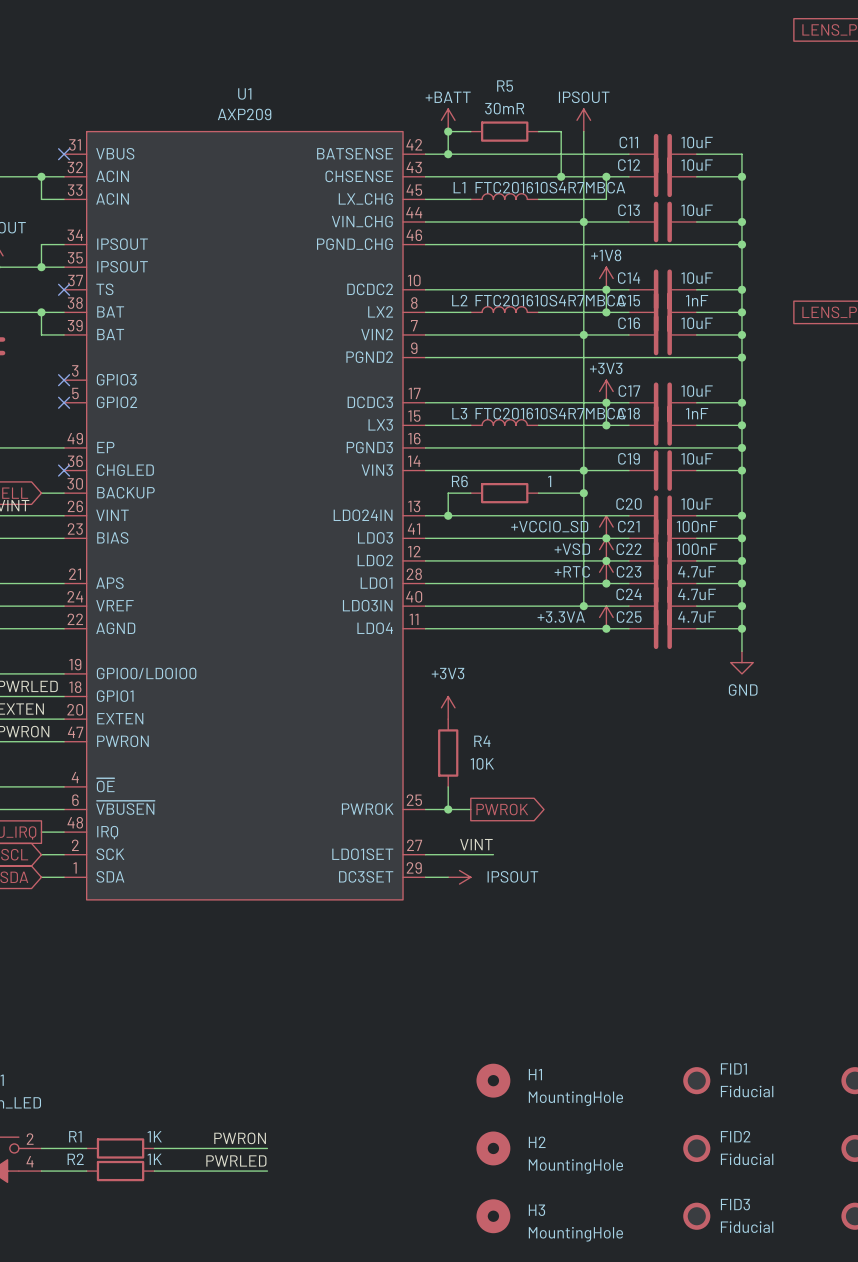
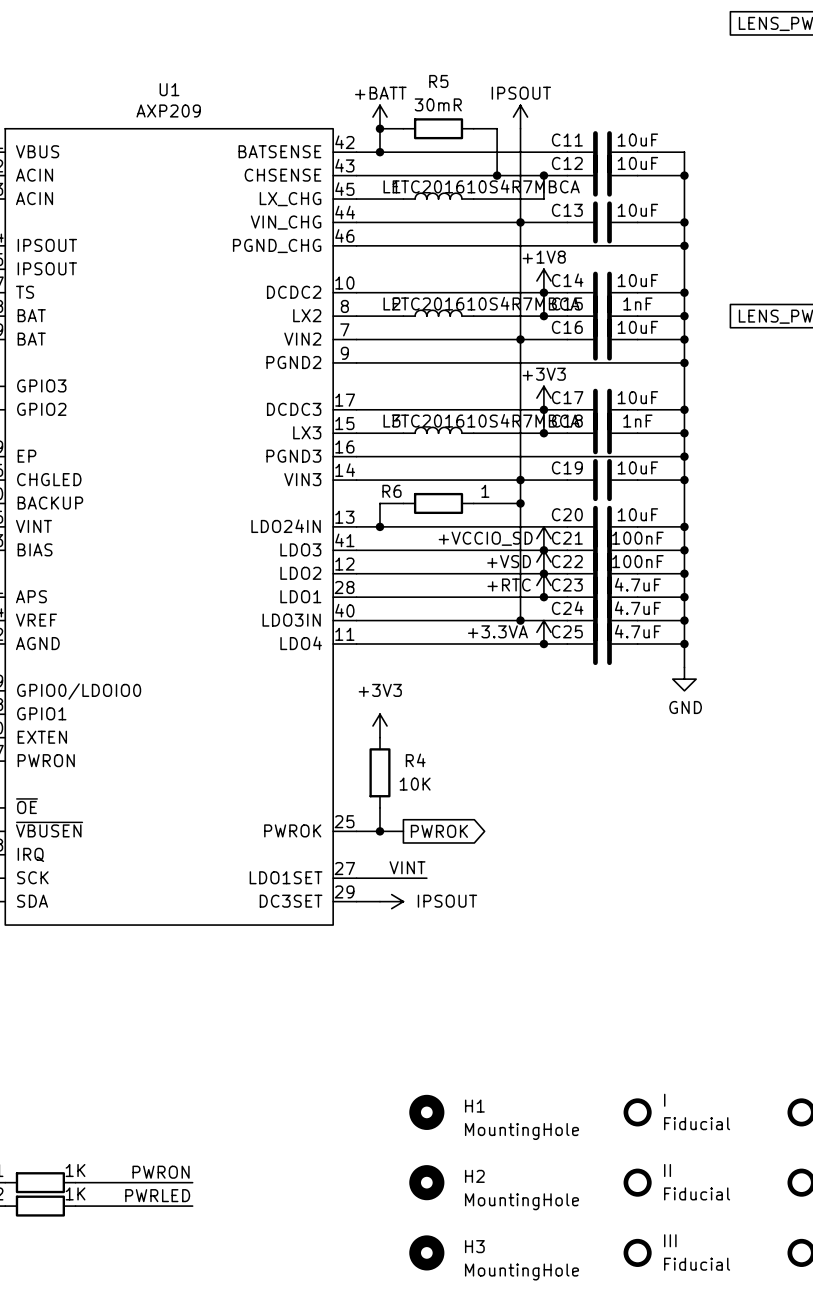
FID1 name: FID1 (733, 1068) -> I (664, 1100)
FID2 name: FID2 (735, 1136) -> II (667, 1170)
FID3 name: FID3 (735, 1204) -> III (670, 1240)

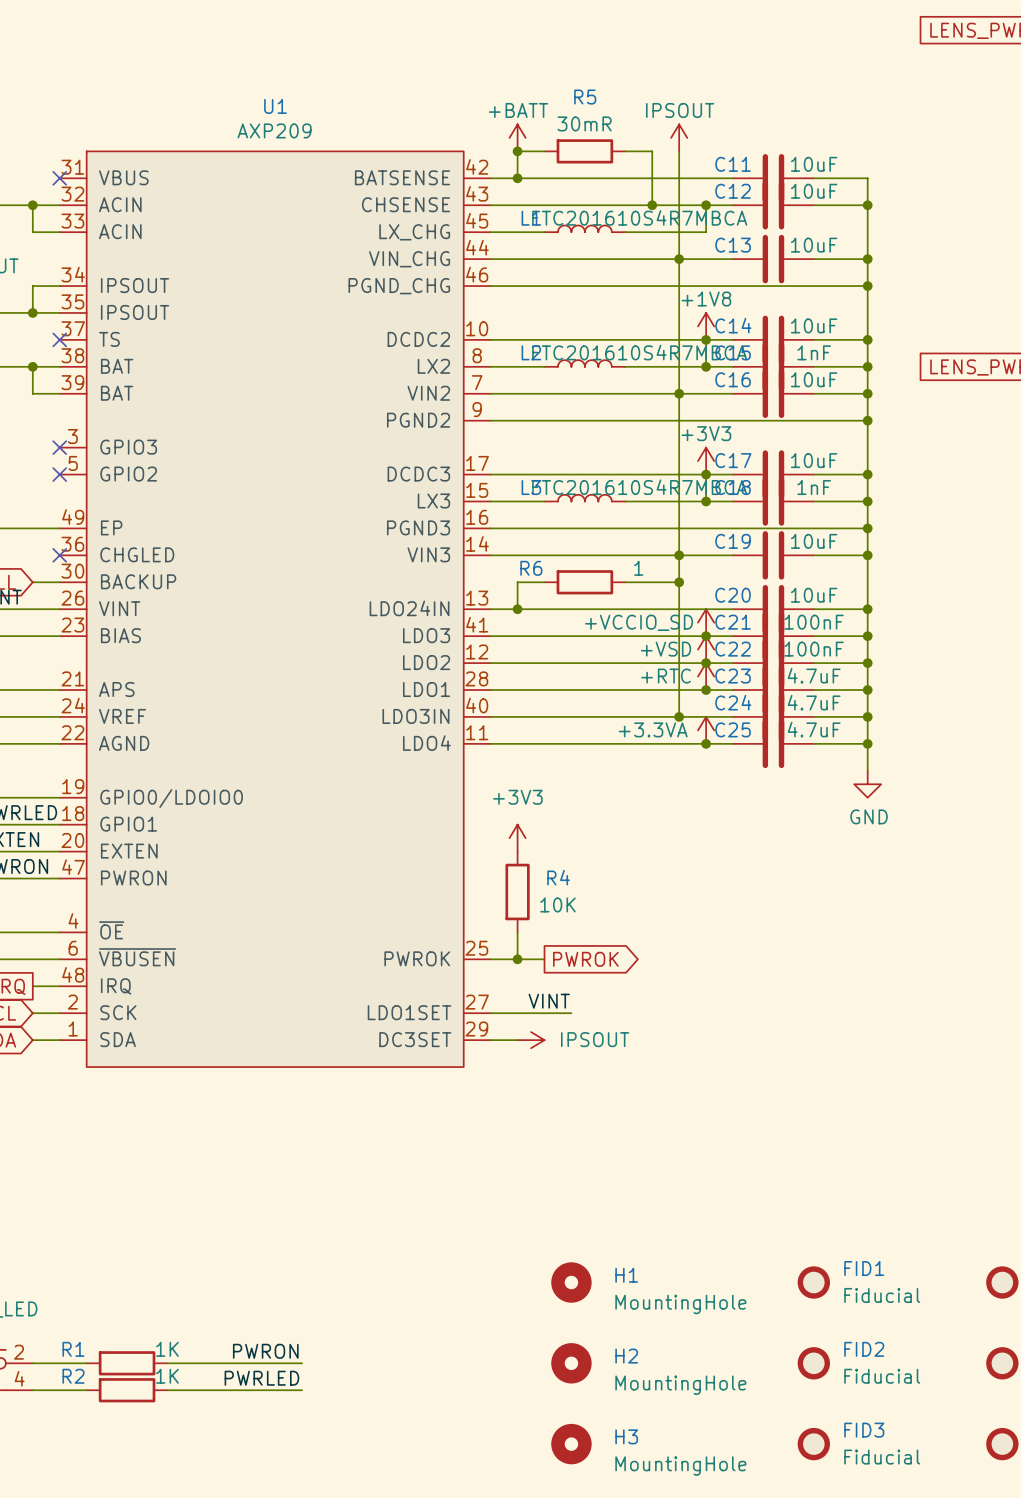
I name: I (664, 1100) -> FID1 (864, 1268)
II name: II (667, 1170) -> FID2 (864, 1349)
III name: III (670, 1240) -> FID3 (864, 1430)

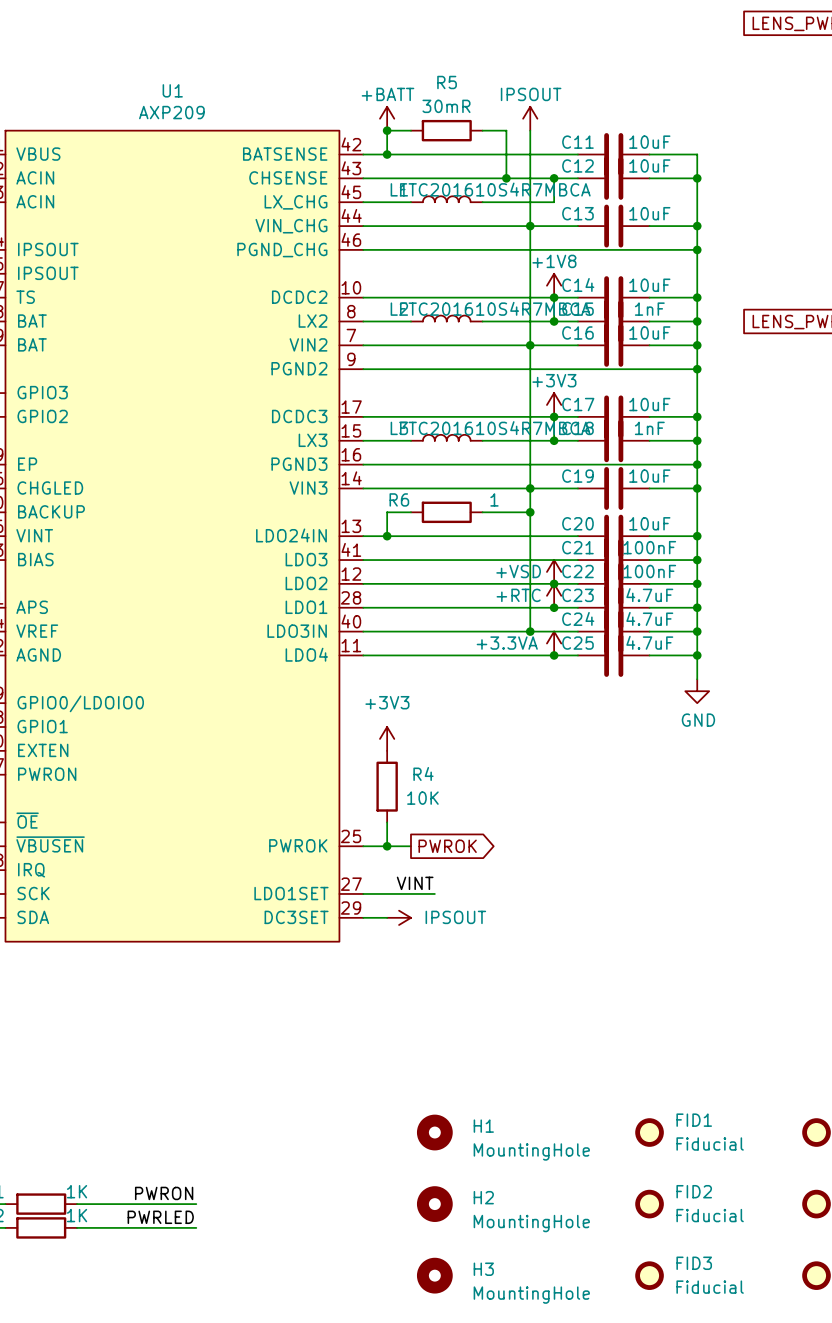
power symbol: +VCCIO_SD (706, 622) -> none
junction: (706, 636) -> none

